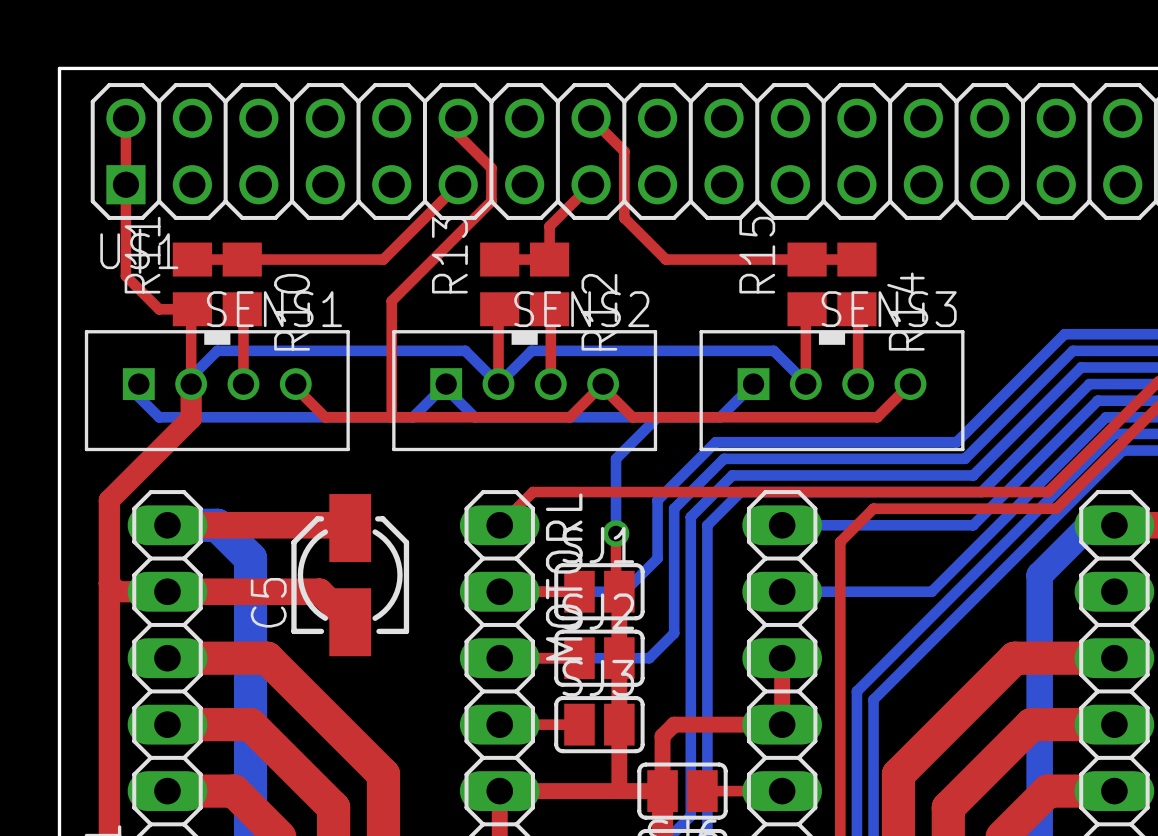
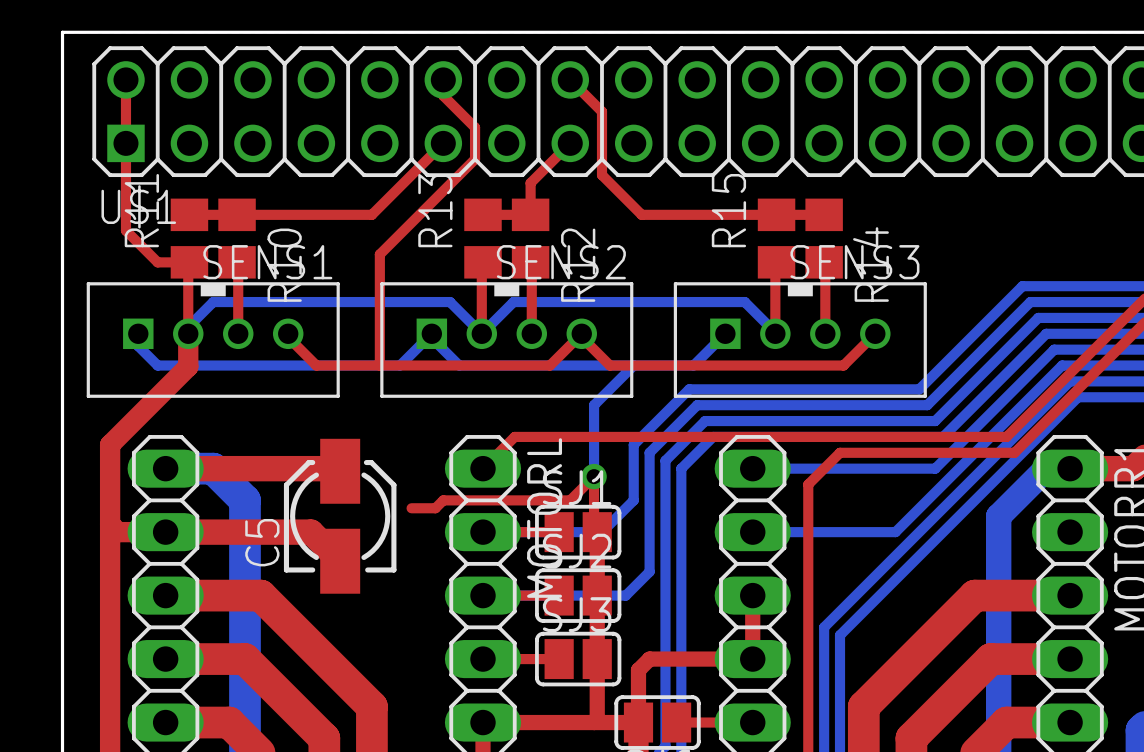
top track: none -> (594, 476) (570, 500) (443, 500) (435, 508) (411, 508)

